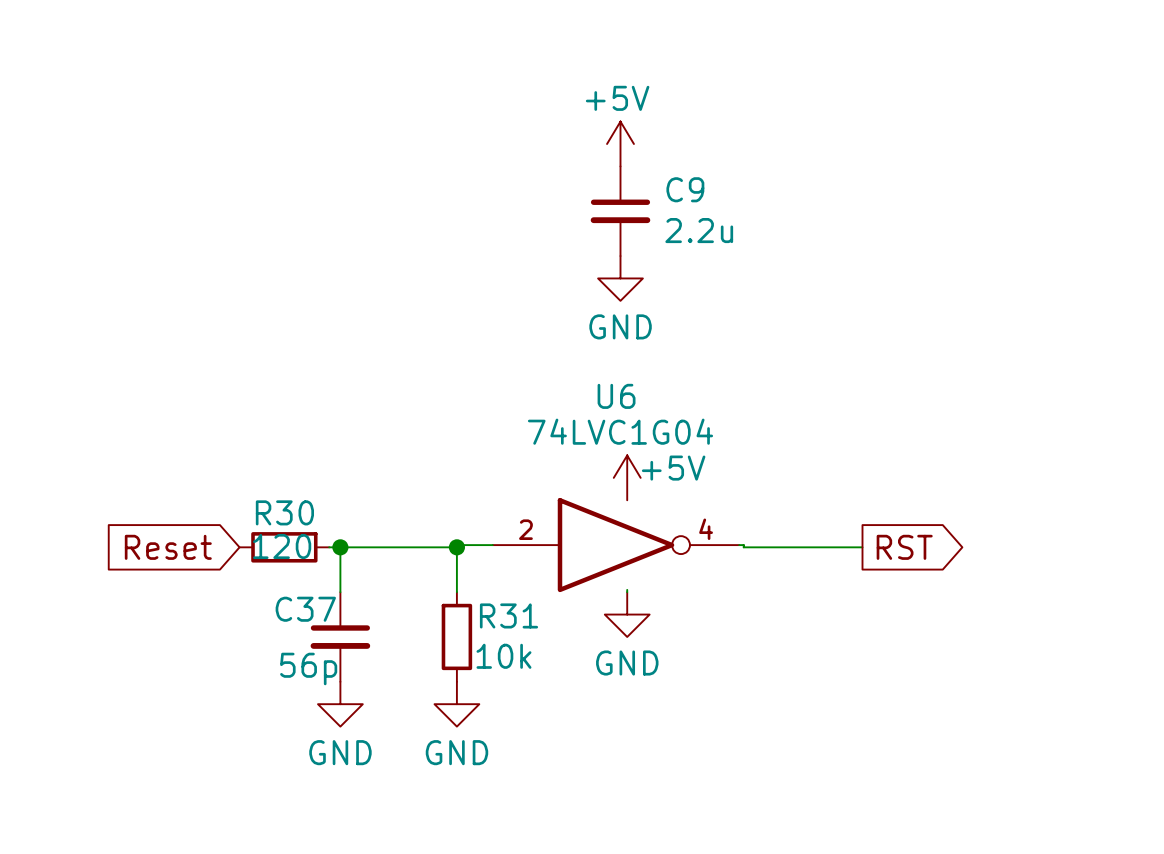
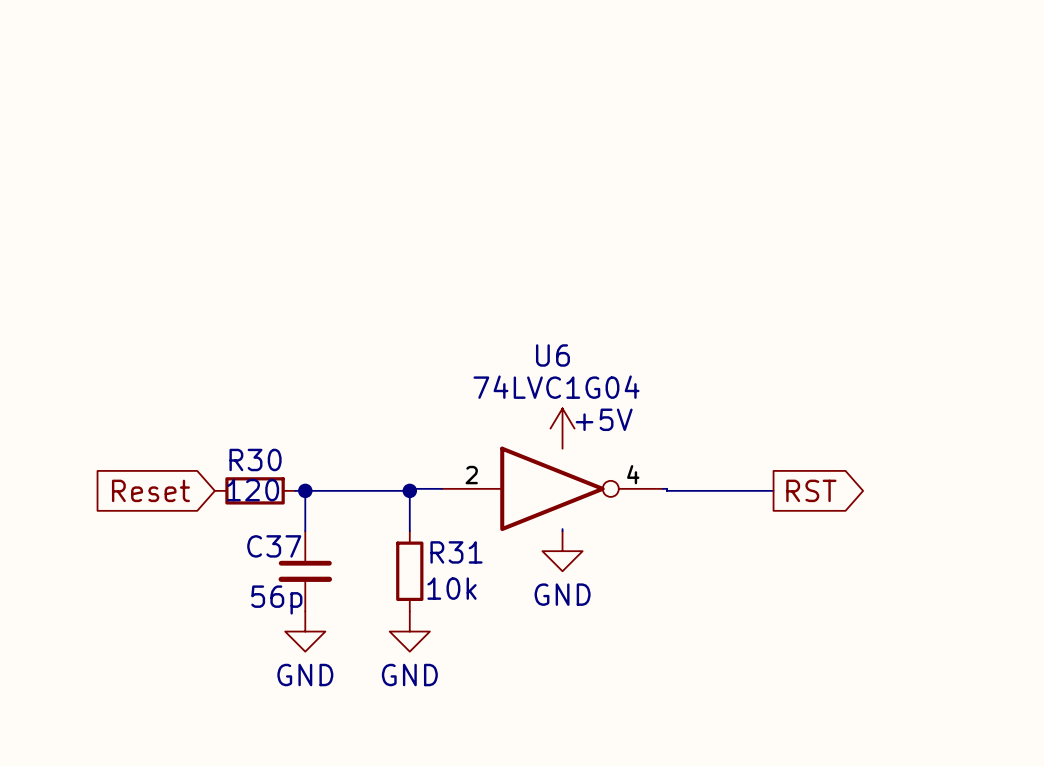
power symbol: +5V (620, 143) -> none
C9: 2.2u (620, 211) -> none
power symbol: GND (620, 278) -> none

